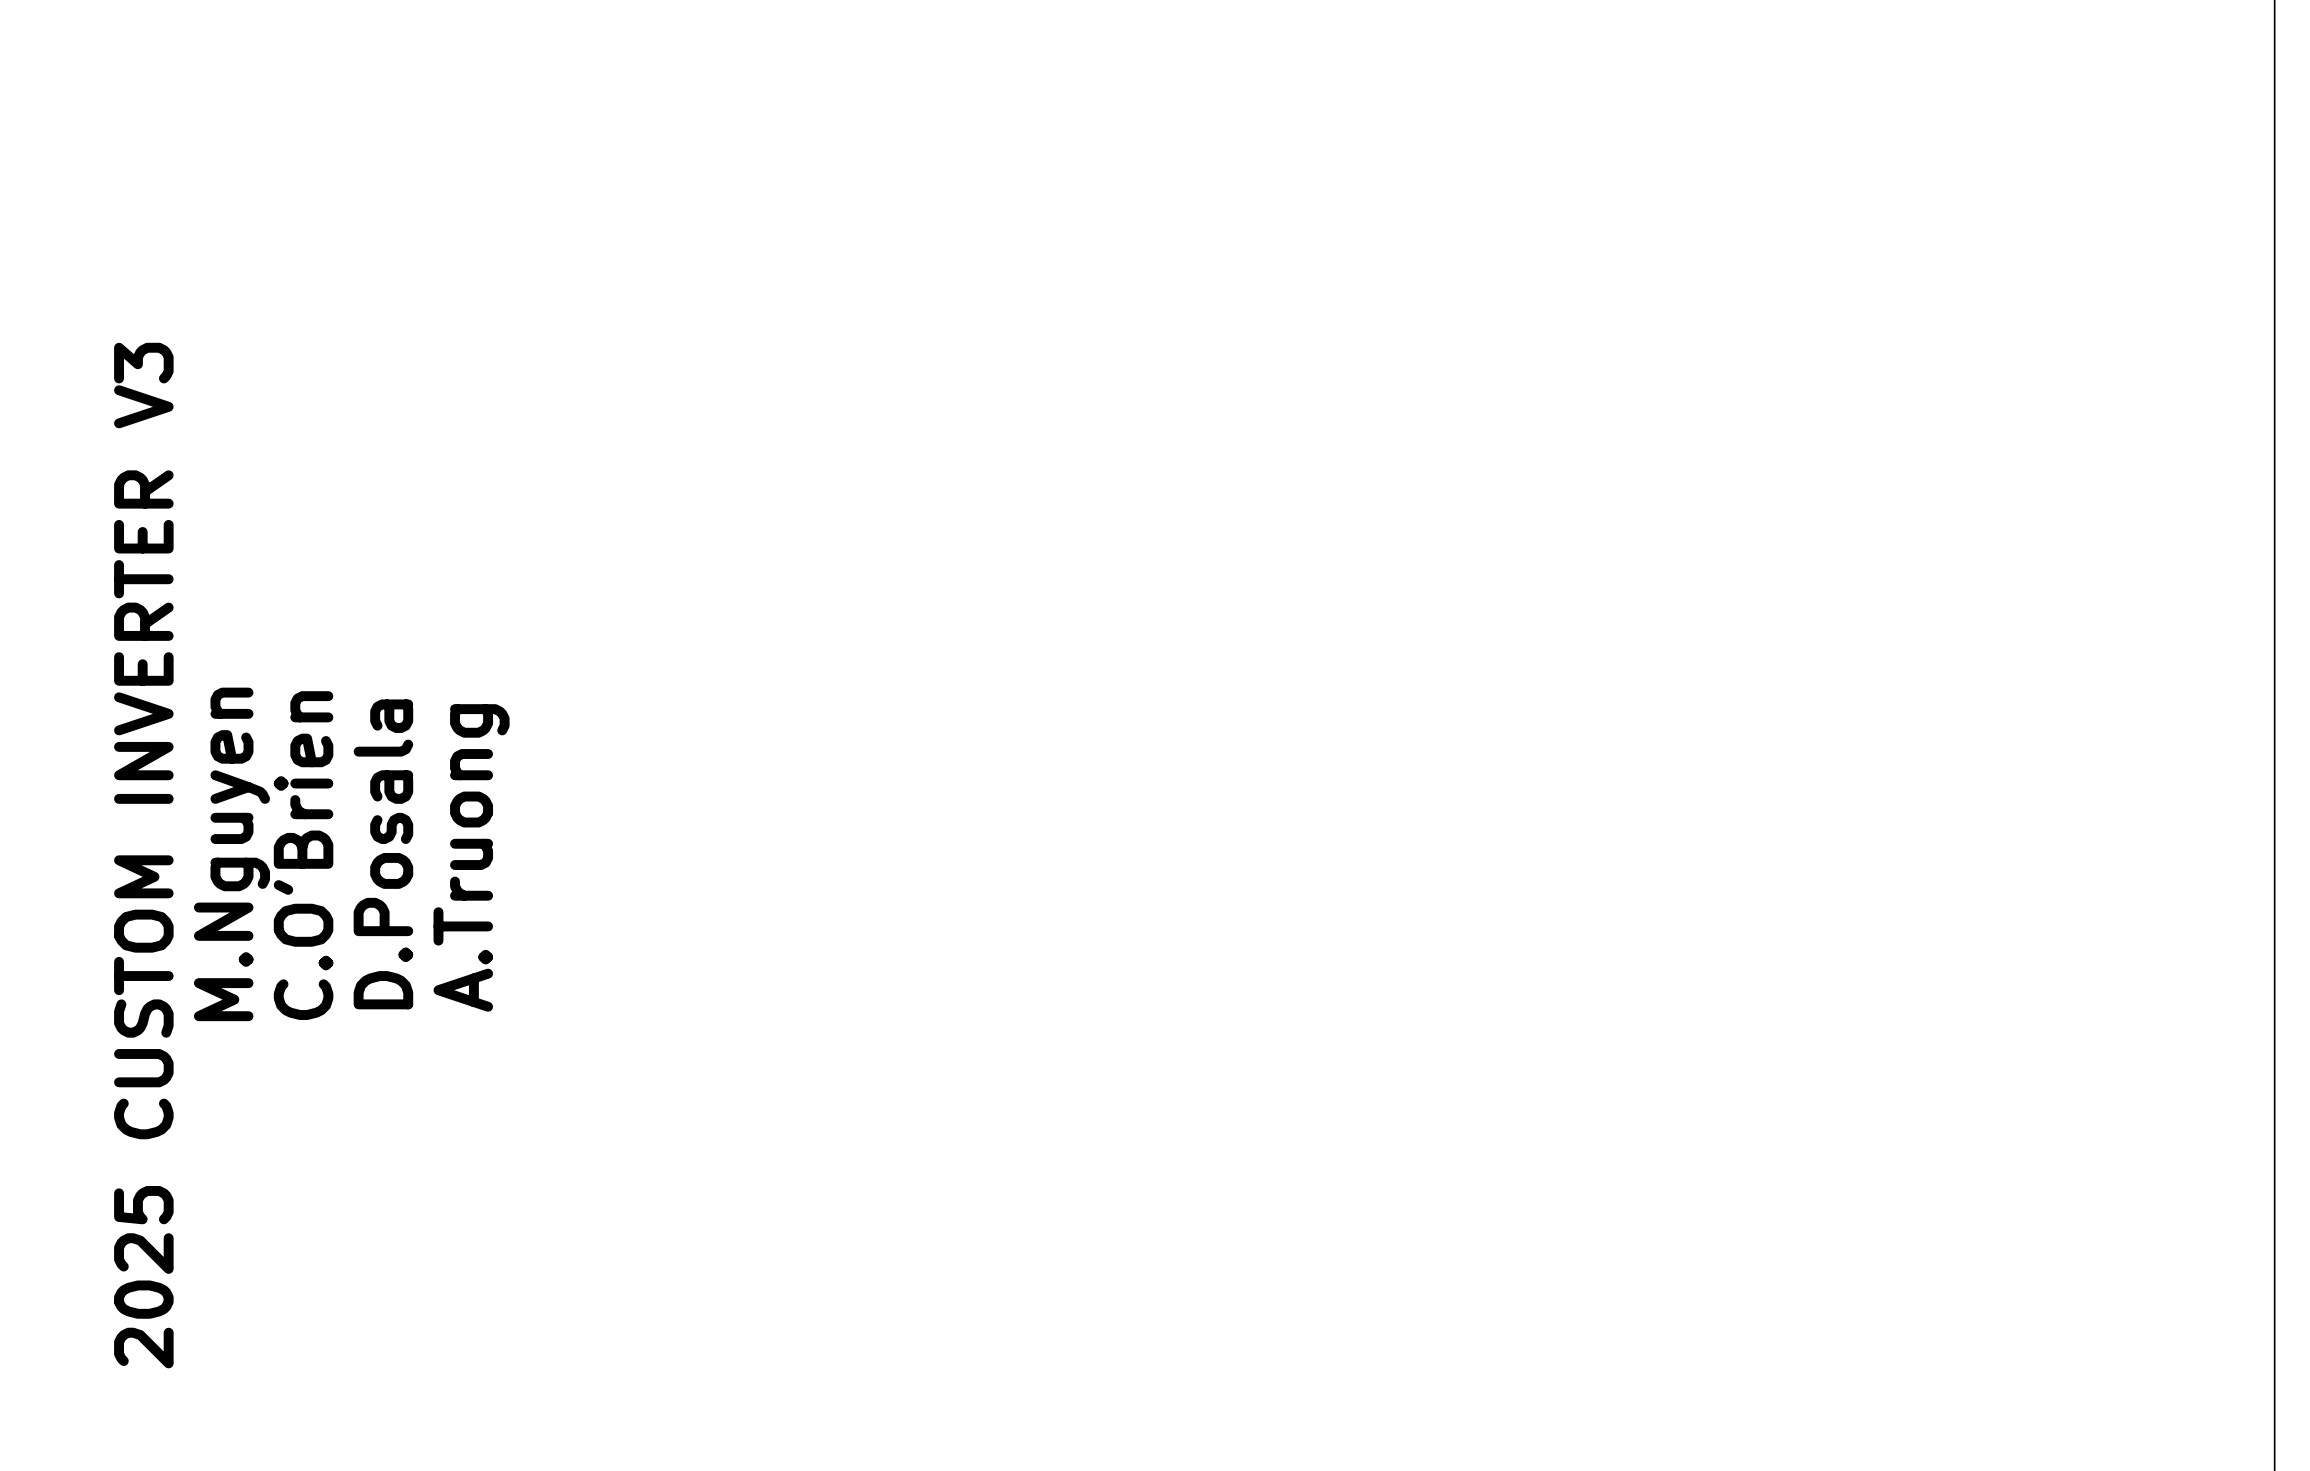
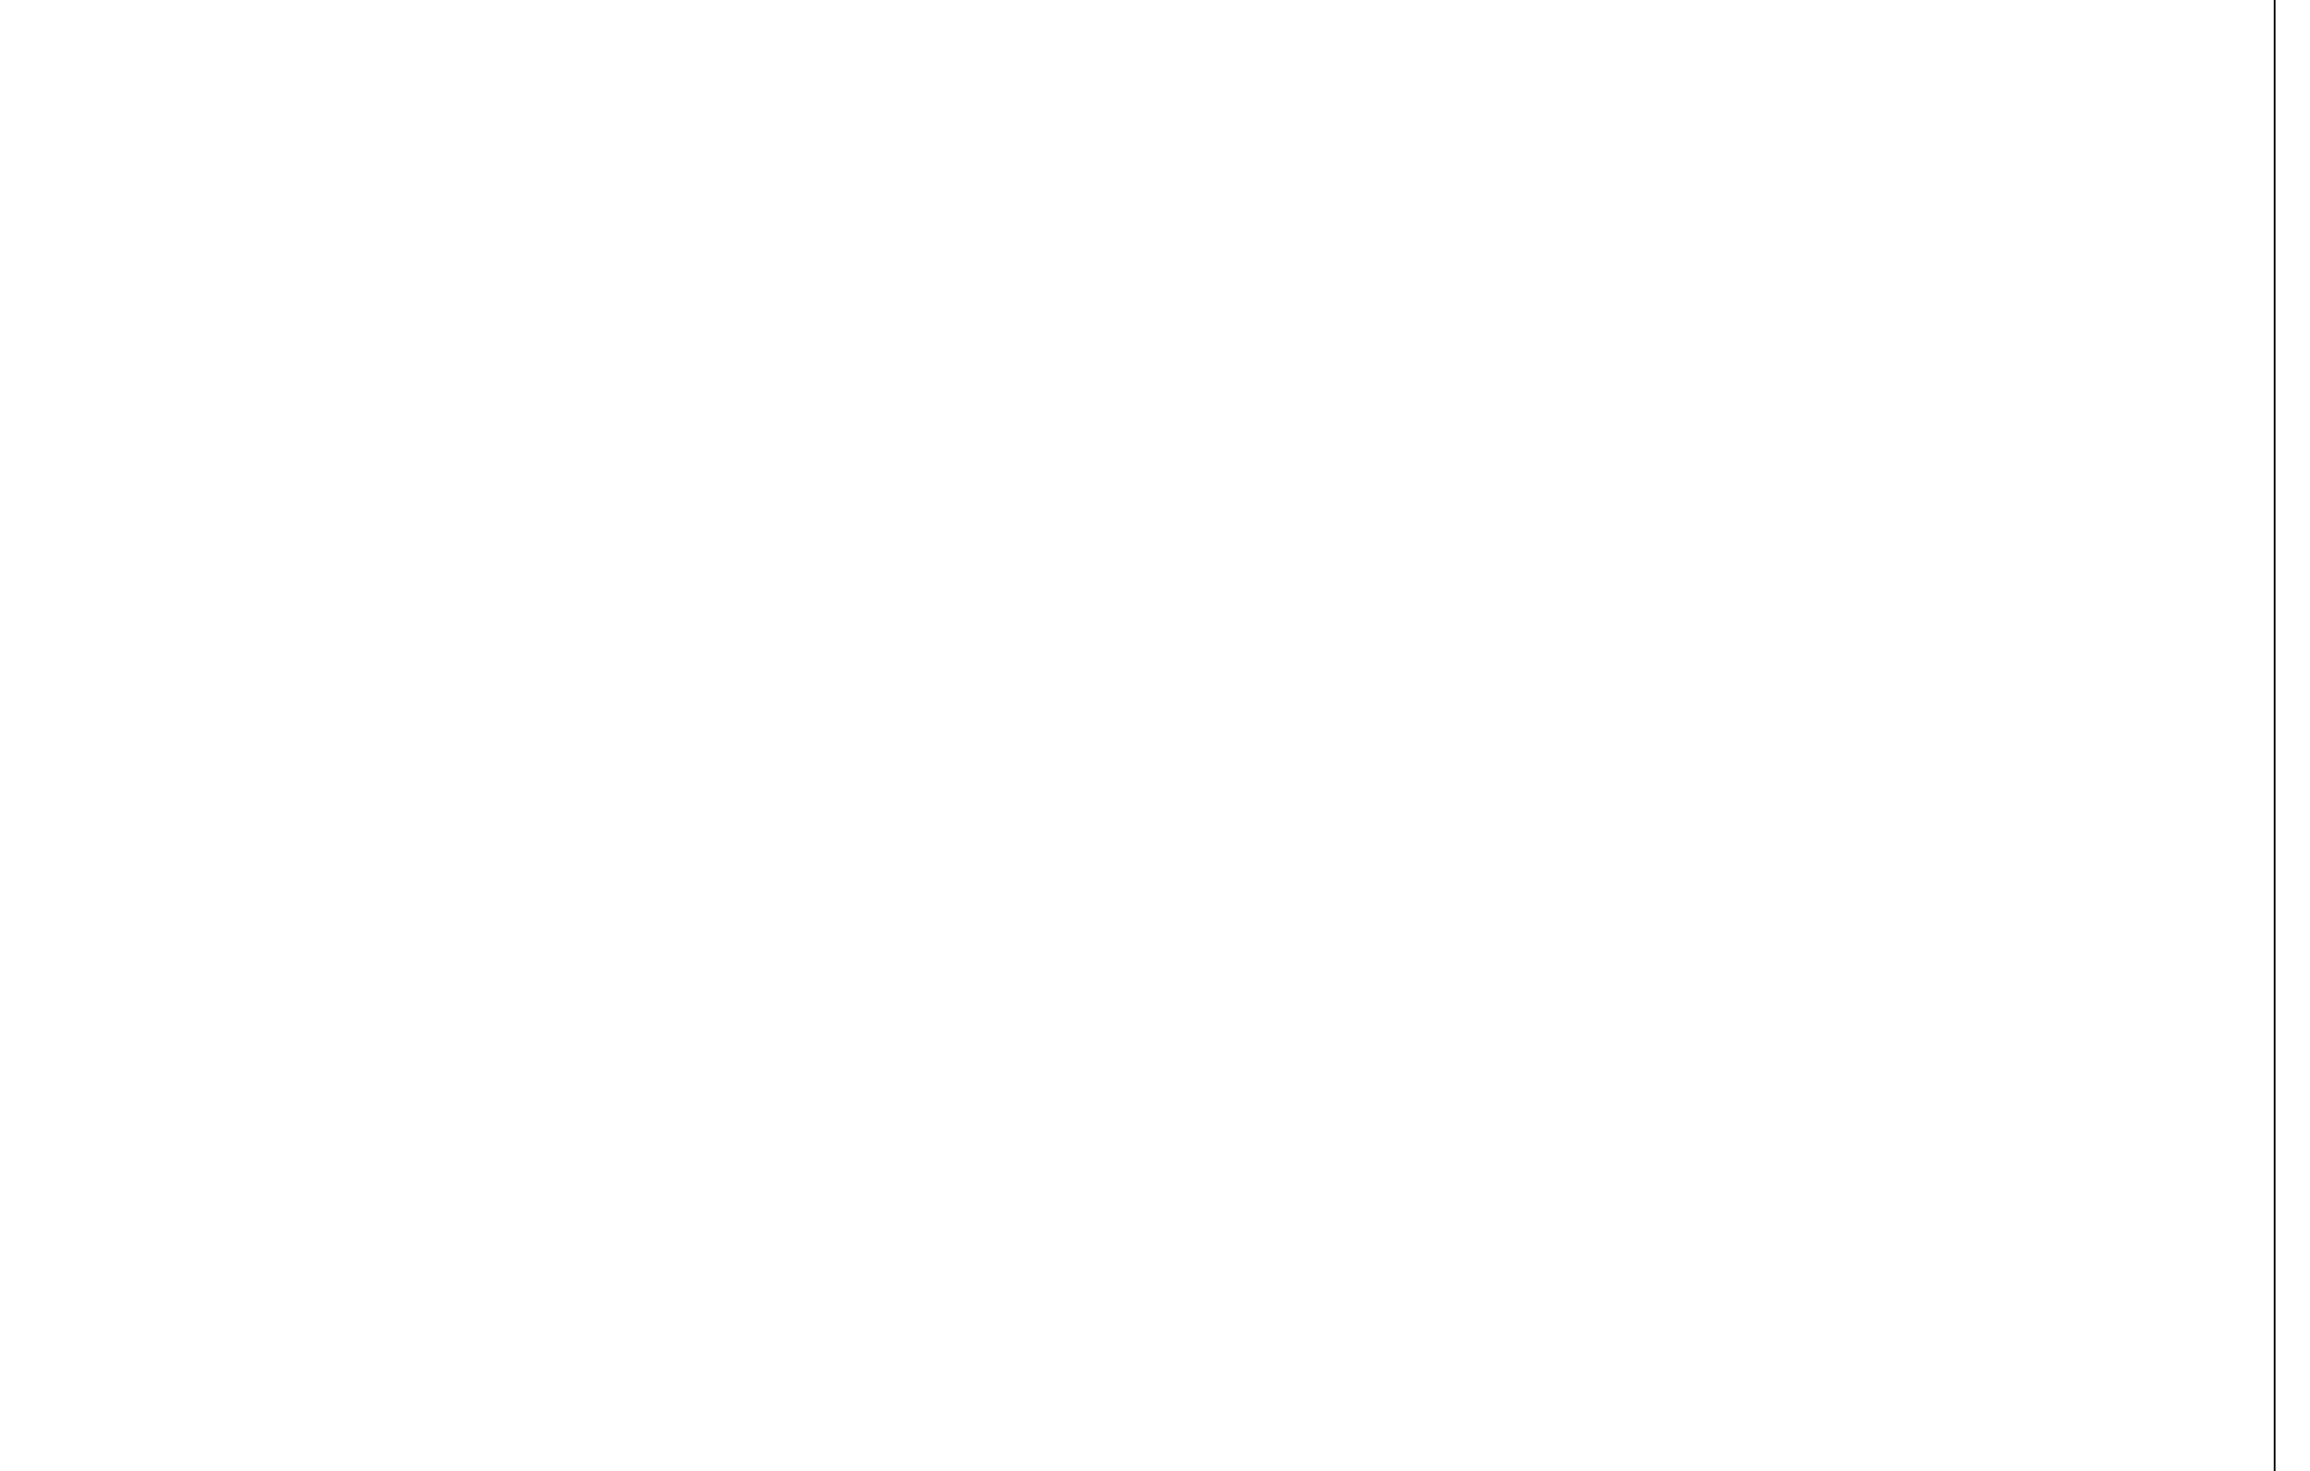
text: M.Nguyen (231, 854) -> none
text: D.Posala (383, 854) -> none
text: 2025 CUSTOM INVERTER V3 (143, 855) -> none
text: C.O'Brien (303, 855) -> none
text: A.Truong (471, 857) -> none

